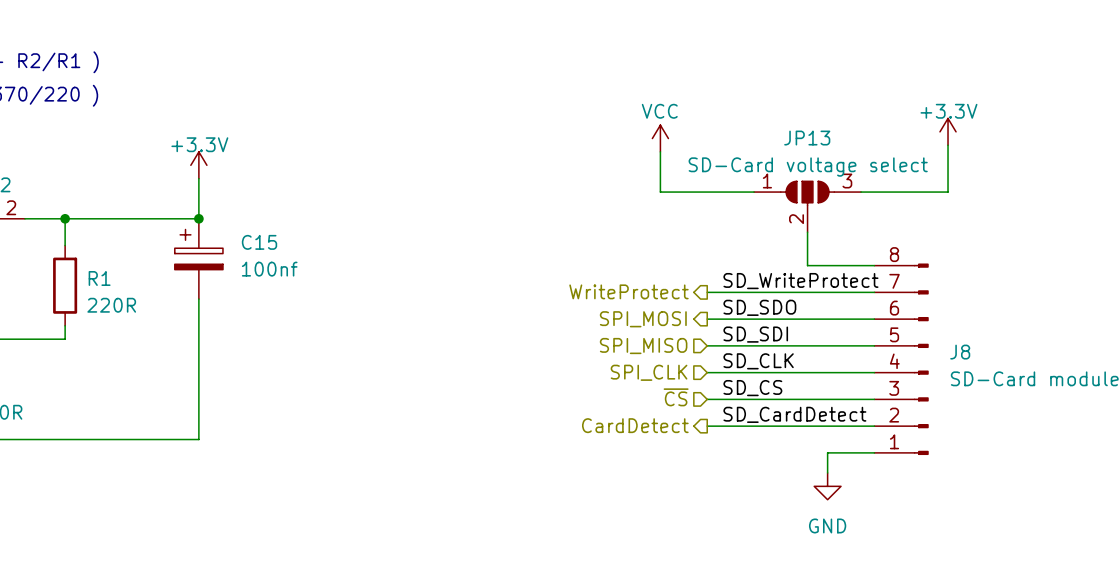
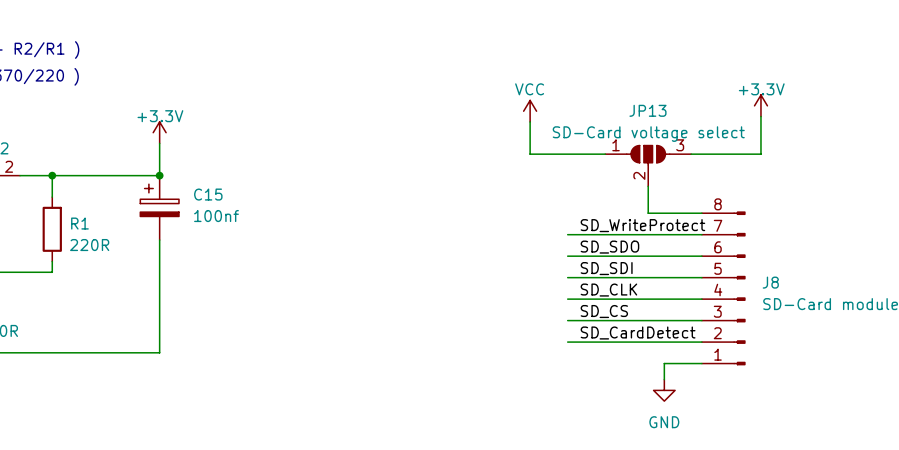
hierarchical label: WriteProtect (628, 291) -> none
hierarchical label: SPI_MOSI (643, 319) -> none
hierarchical label: SPI_MISO (643, 346) -> none
hierarchical label: SPI_CLK (649, 372) -> none
hierarchical label: ~{CS} (676, 397) -> none
hierarchical label: CardDetect (635, 425) -> none

